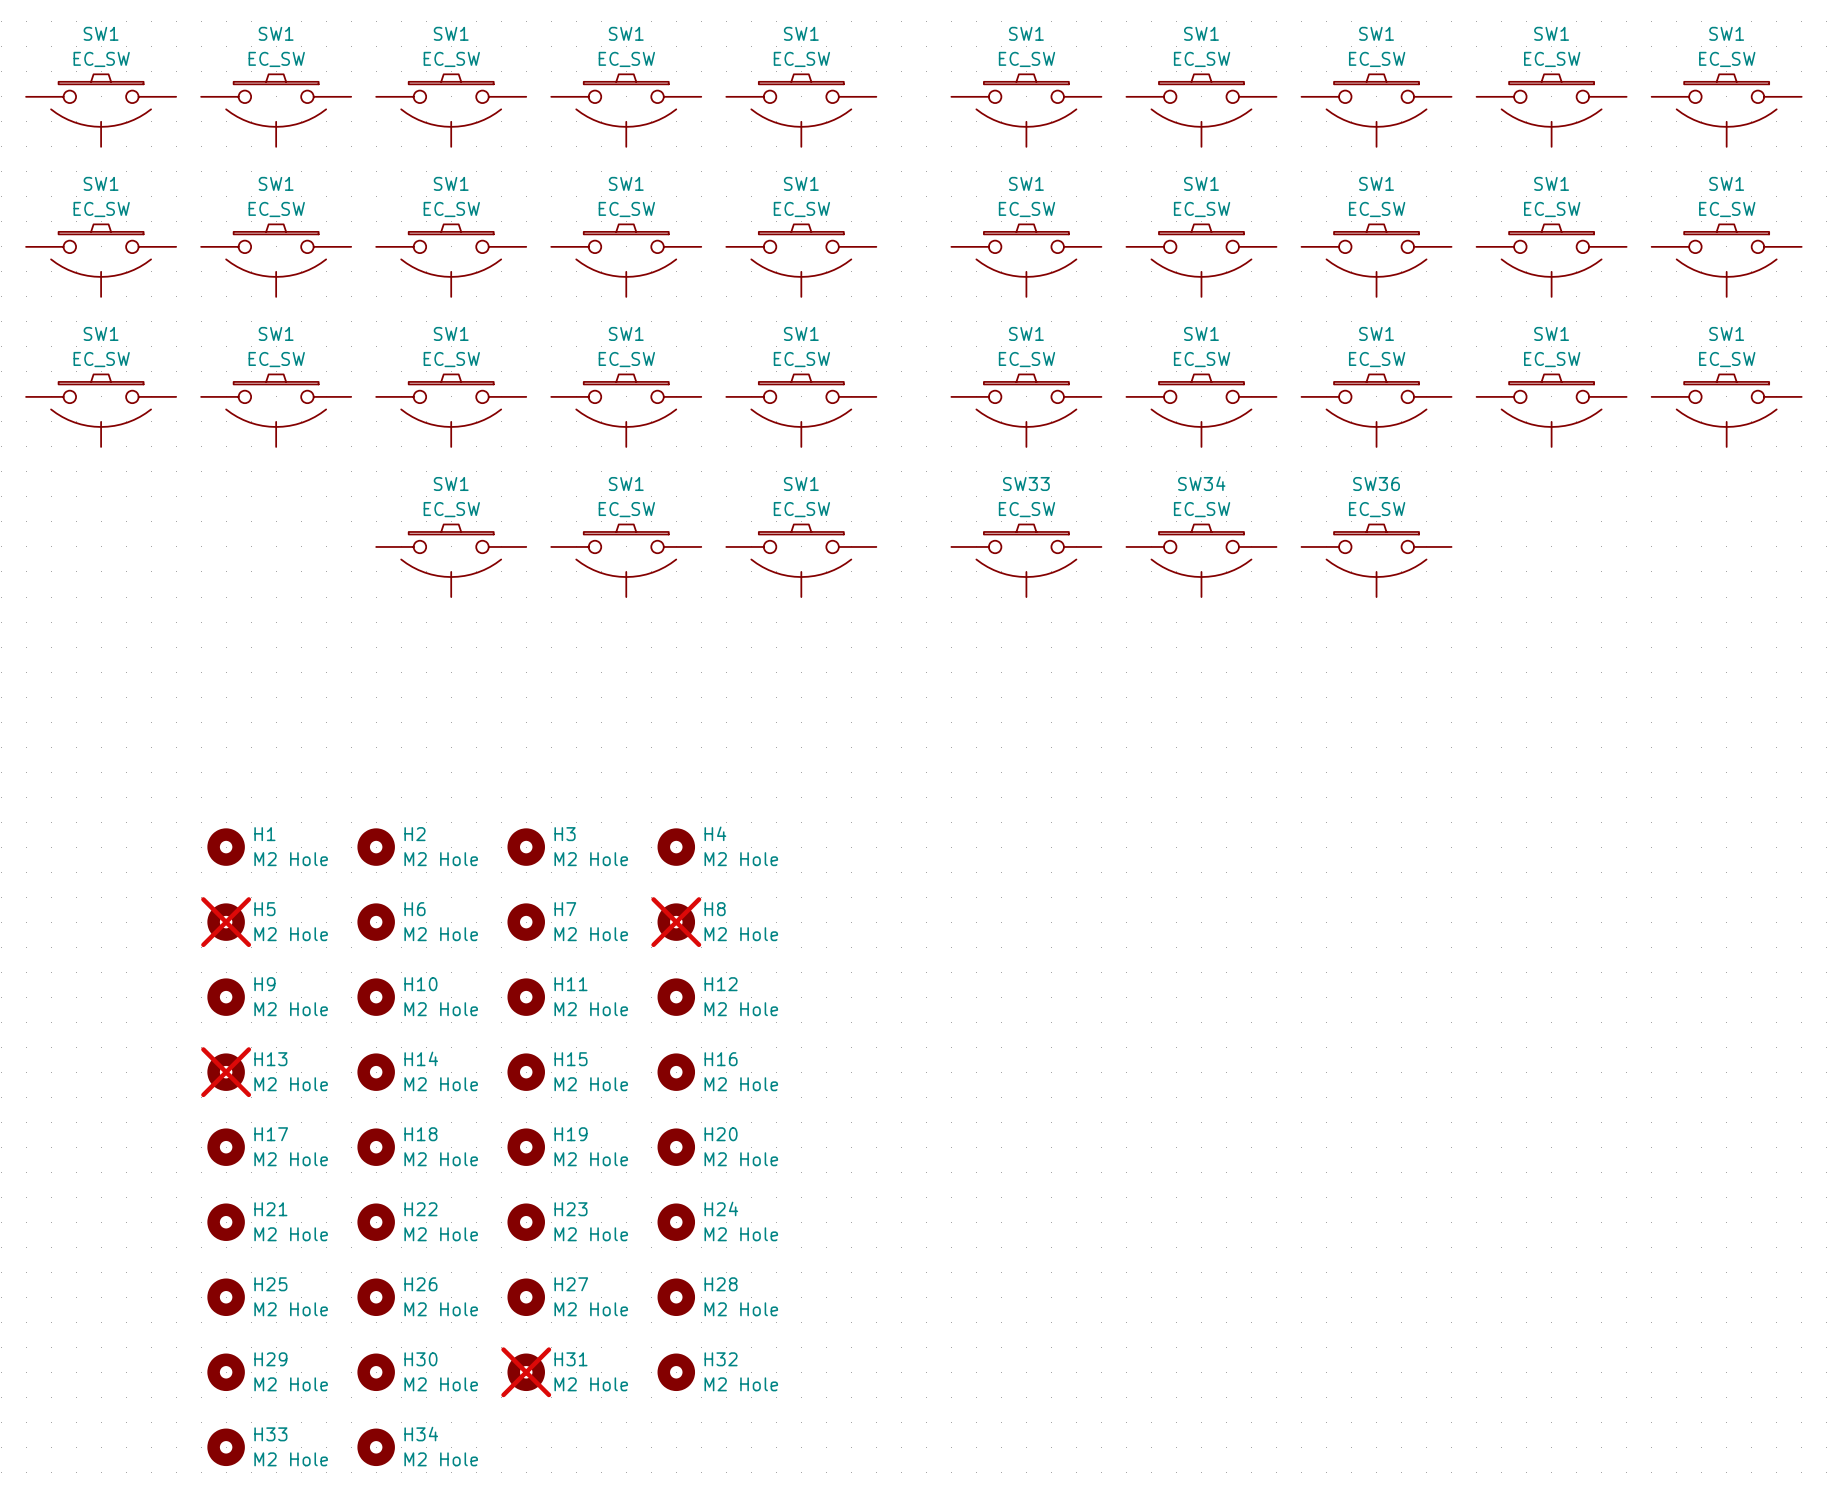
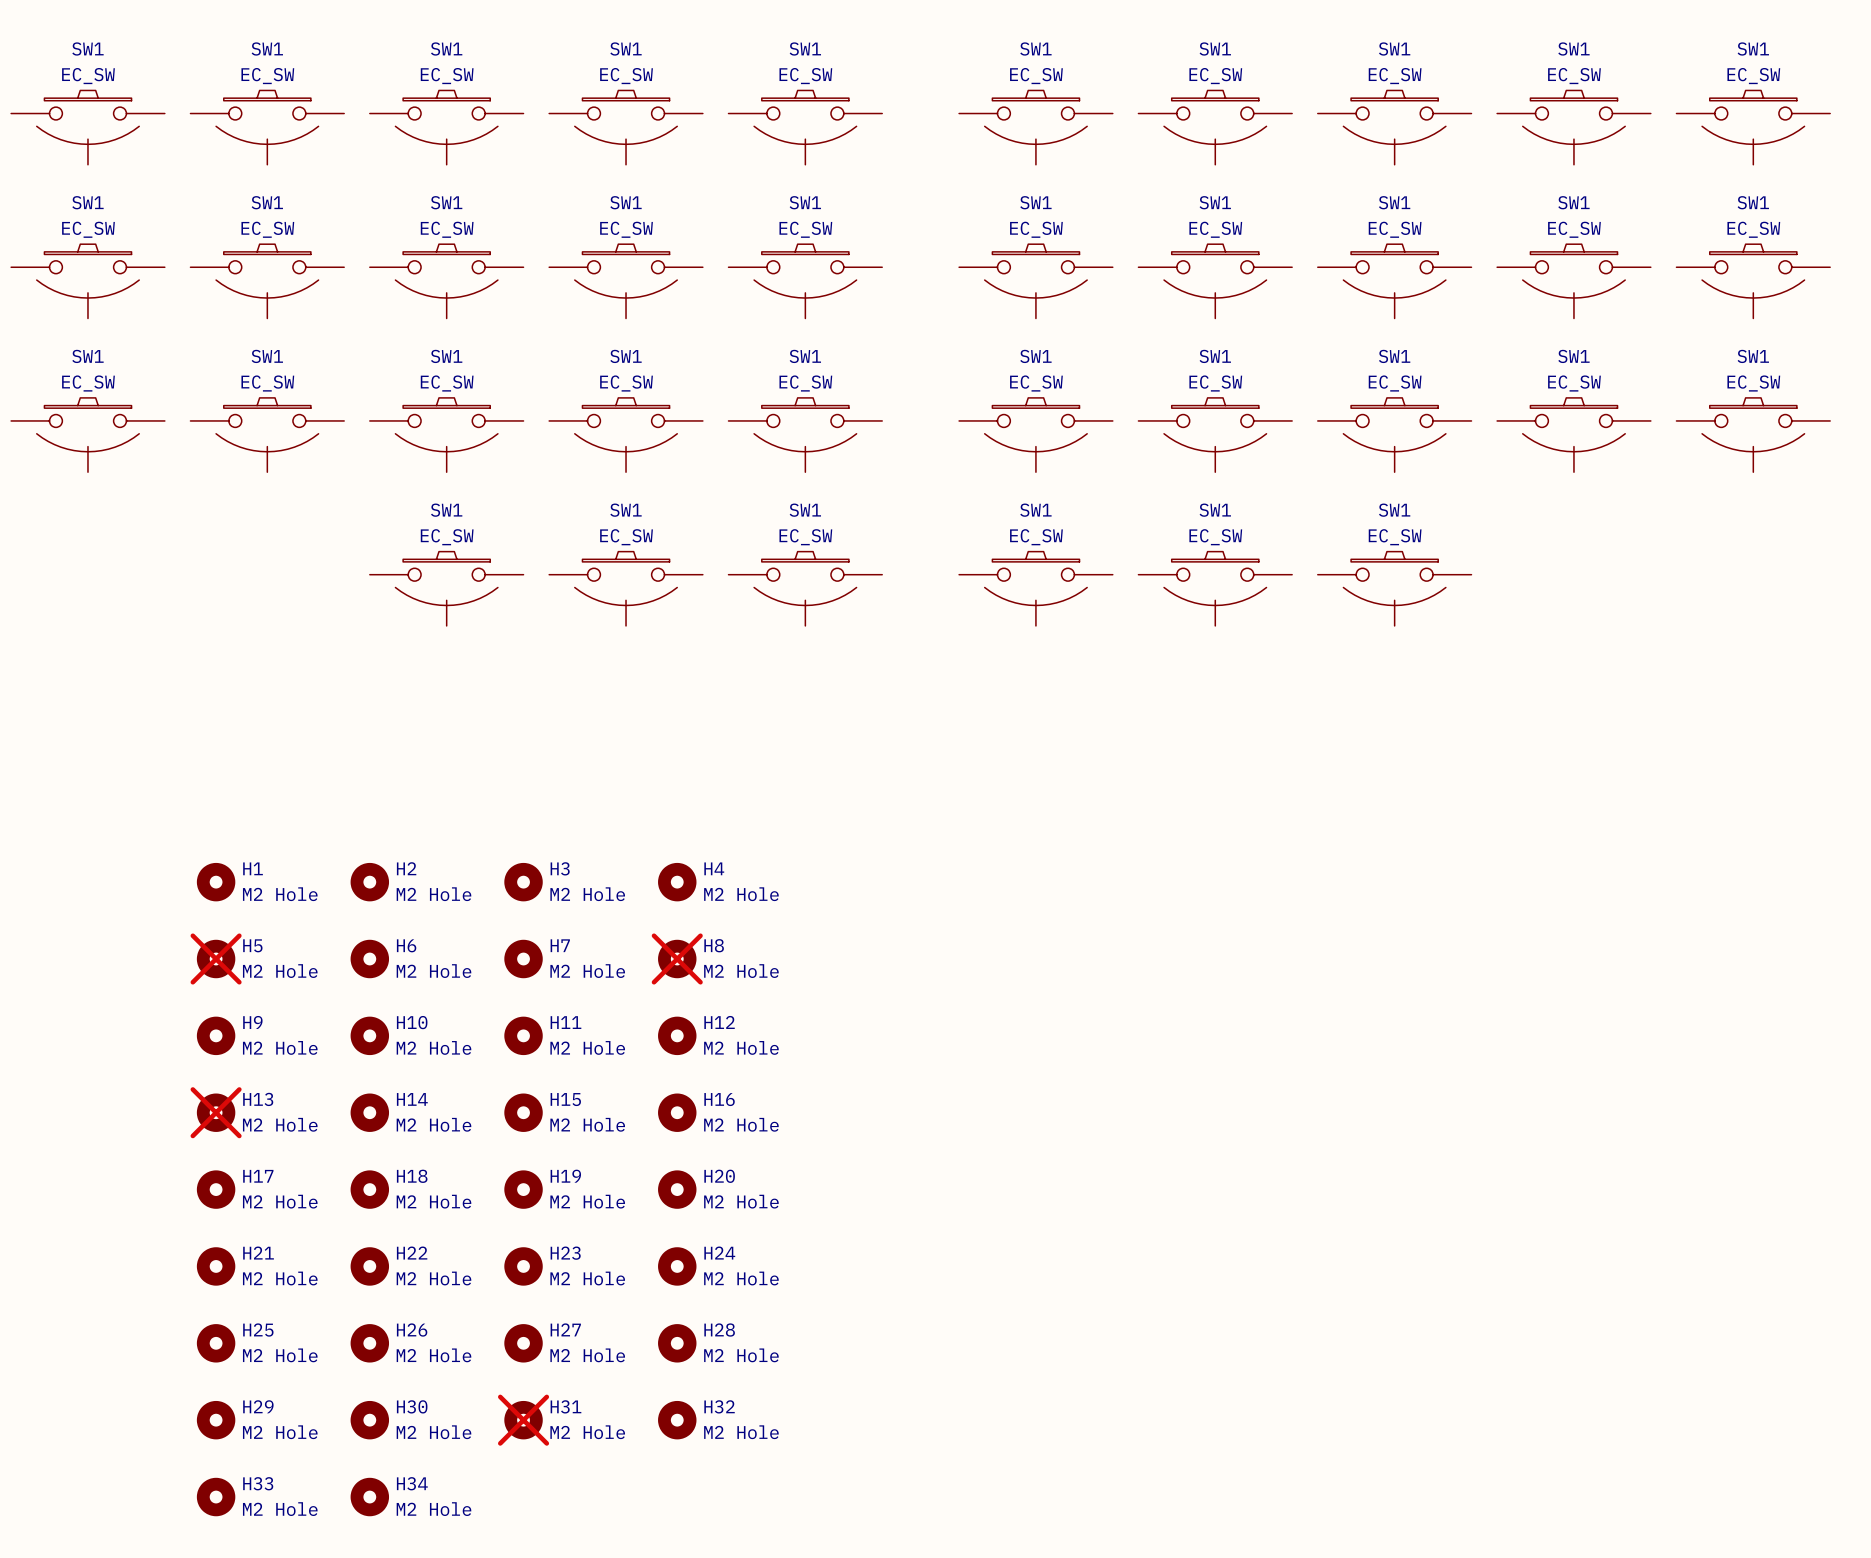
SW33 name: SW33 (1026, 483) -> SW1 (1035, 510)
SW34 name: SW34 (1201, 483) -> SW1 (1215, 510)
SW36 name: SW36 (1376, 483) -> SW1 (1394, 510)

